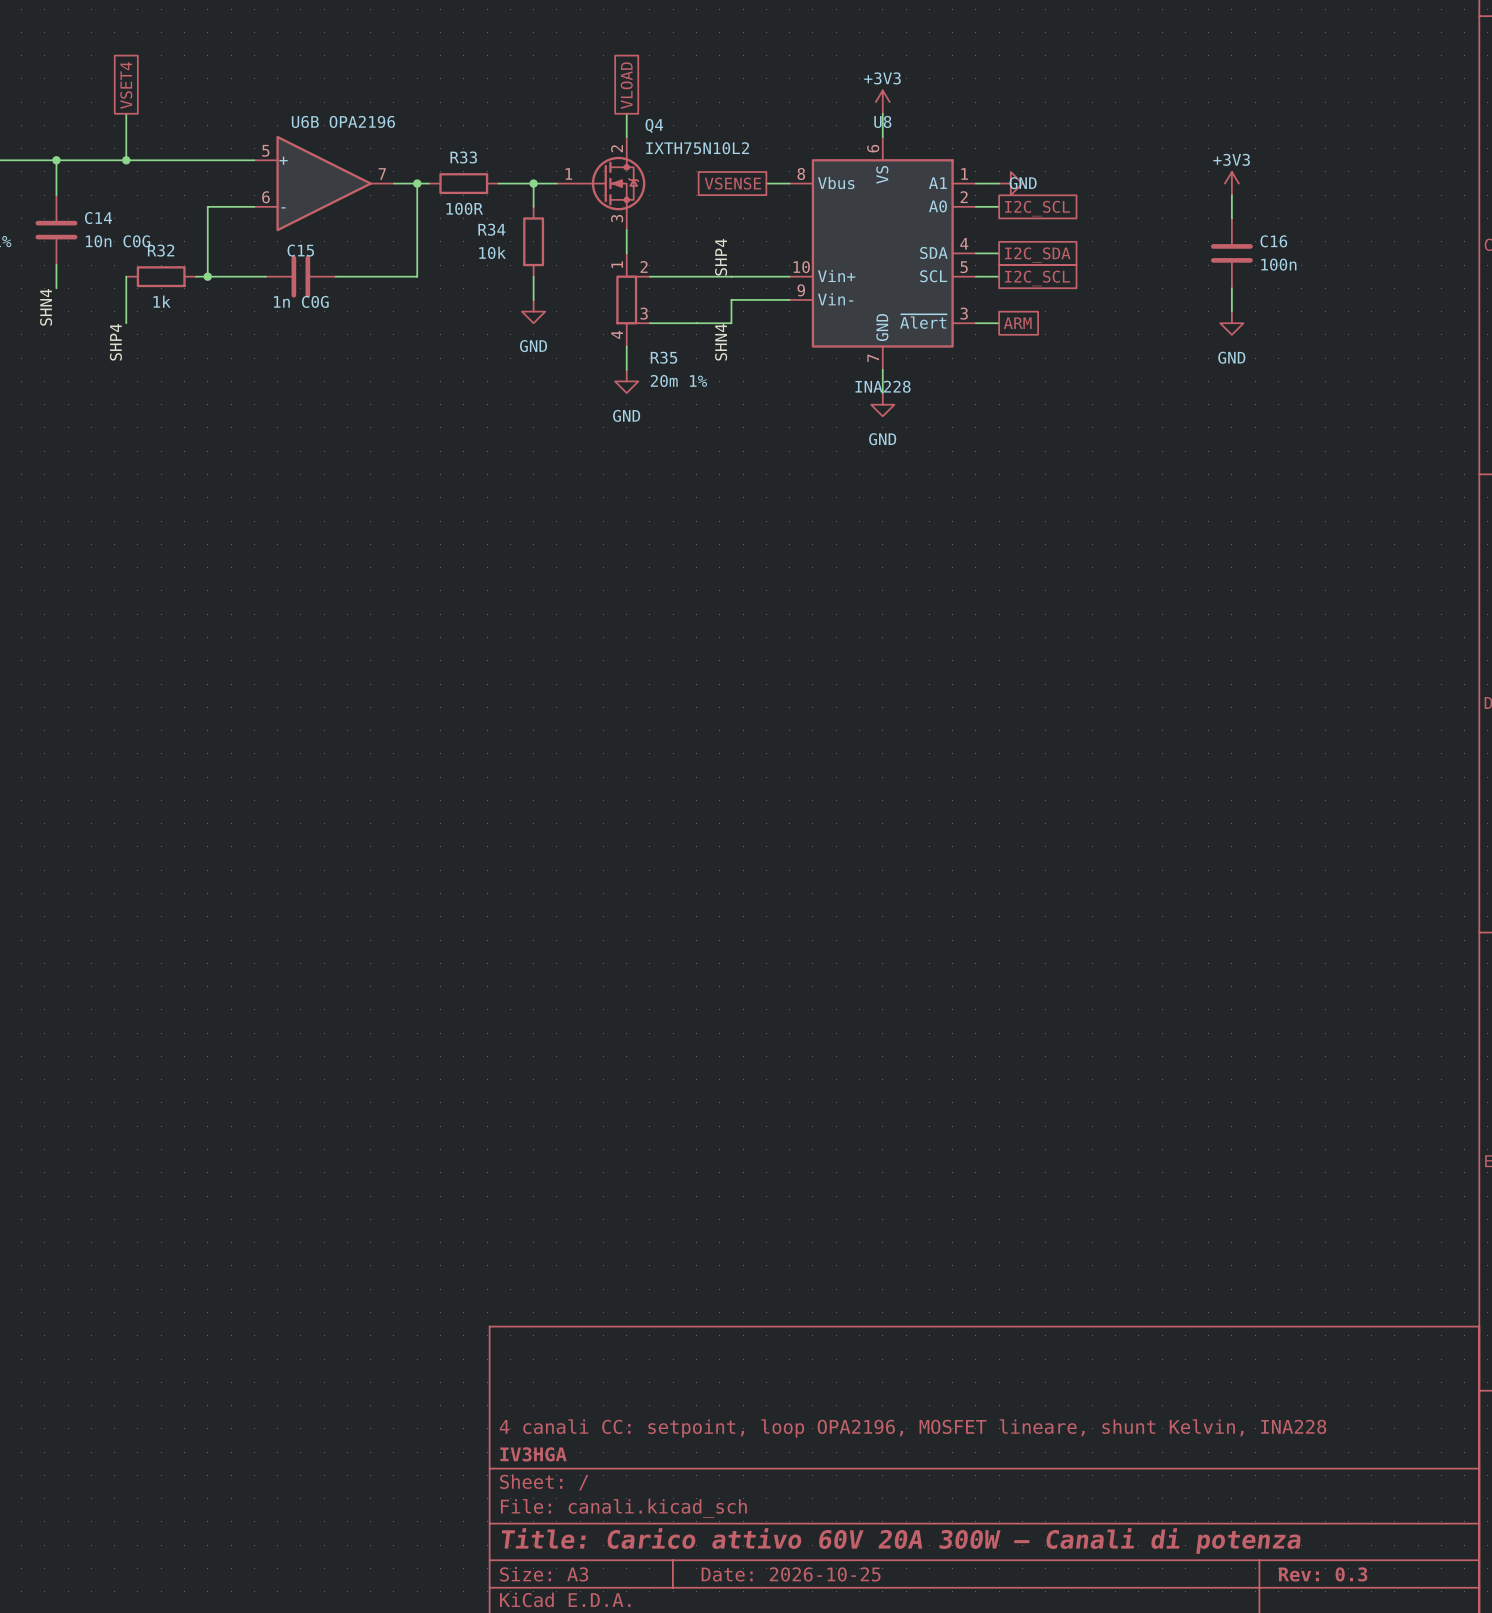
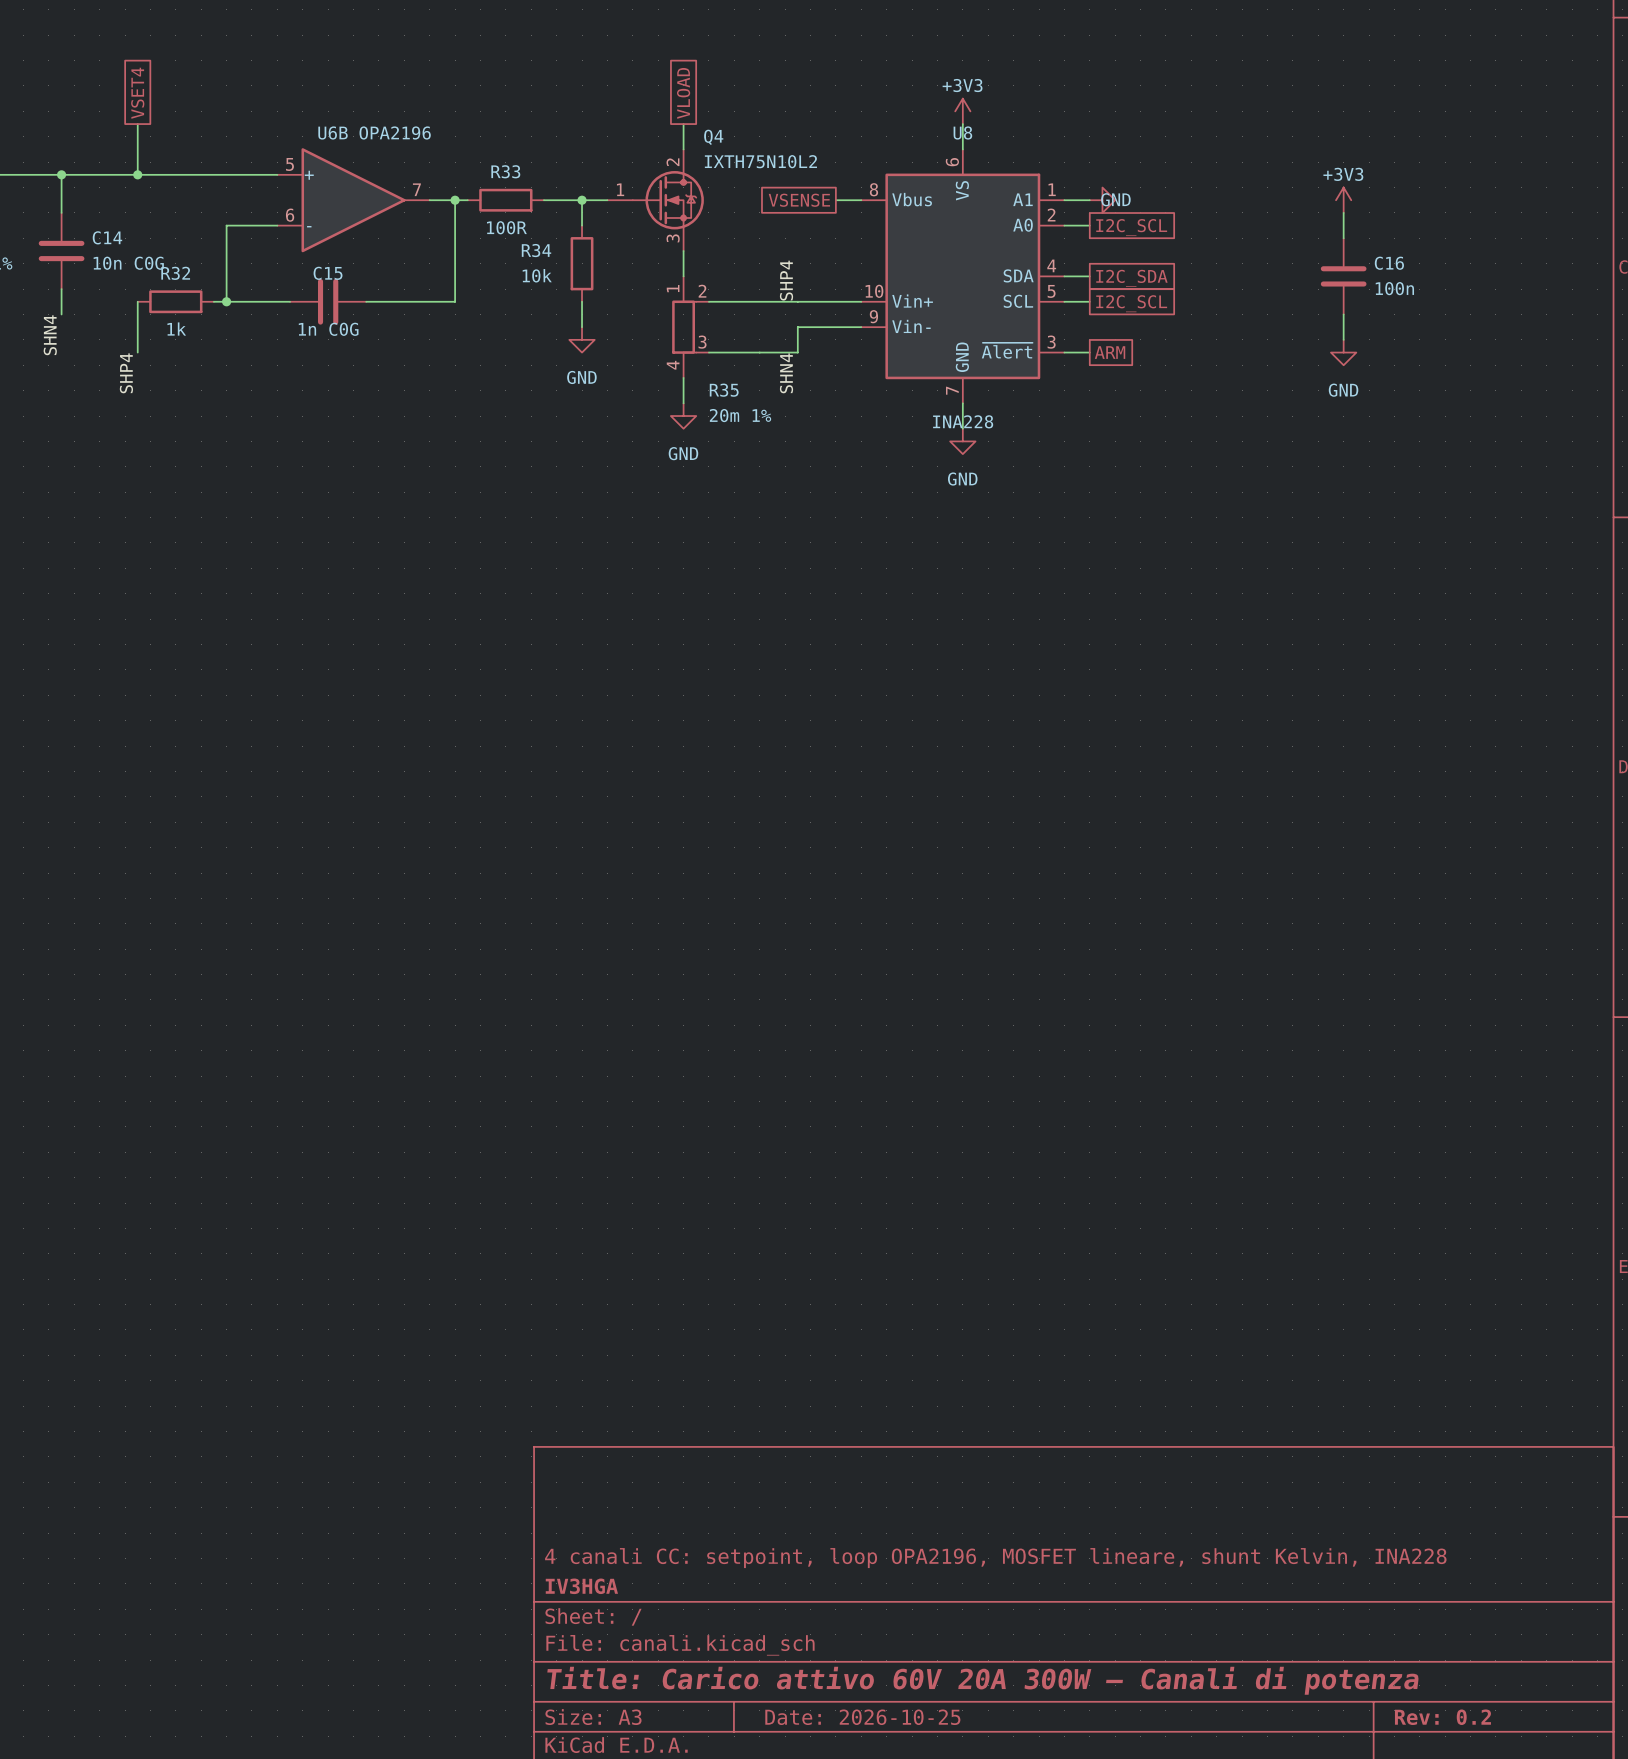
title block: Rev: 0.3 (1323, 1574) -> Rev: 0.2 (1442, 1717)

